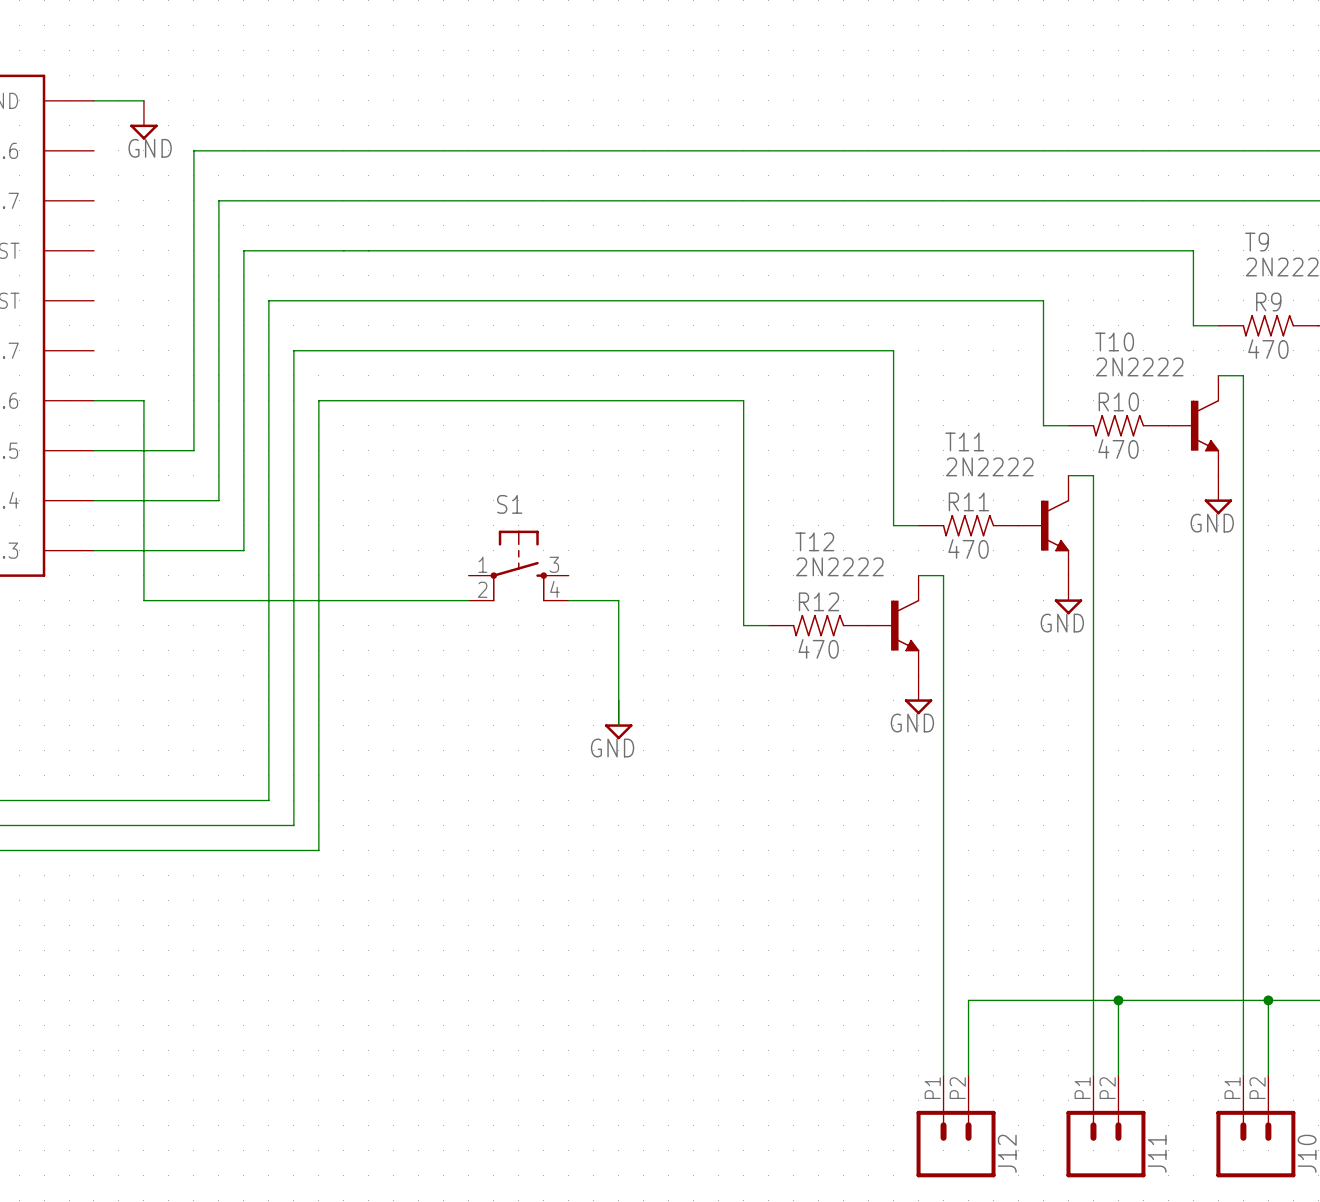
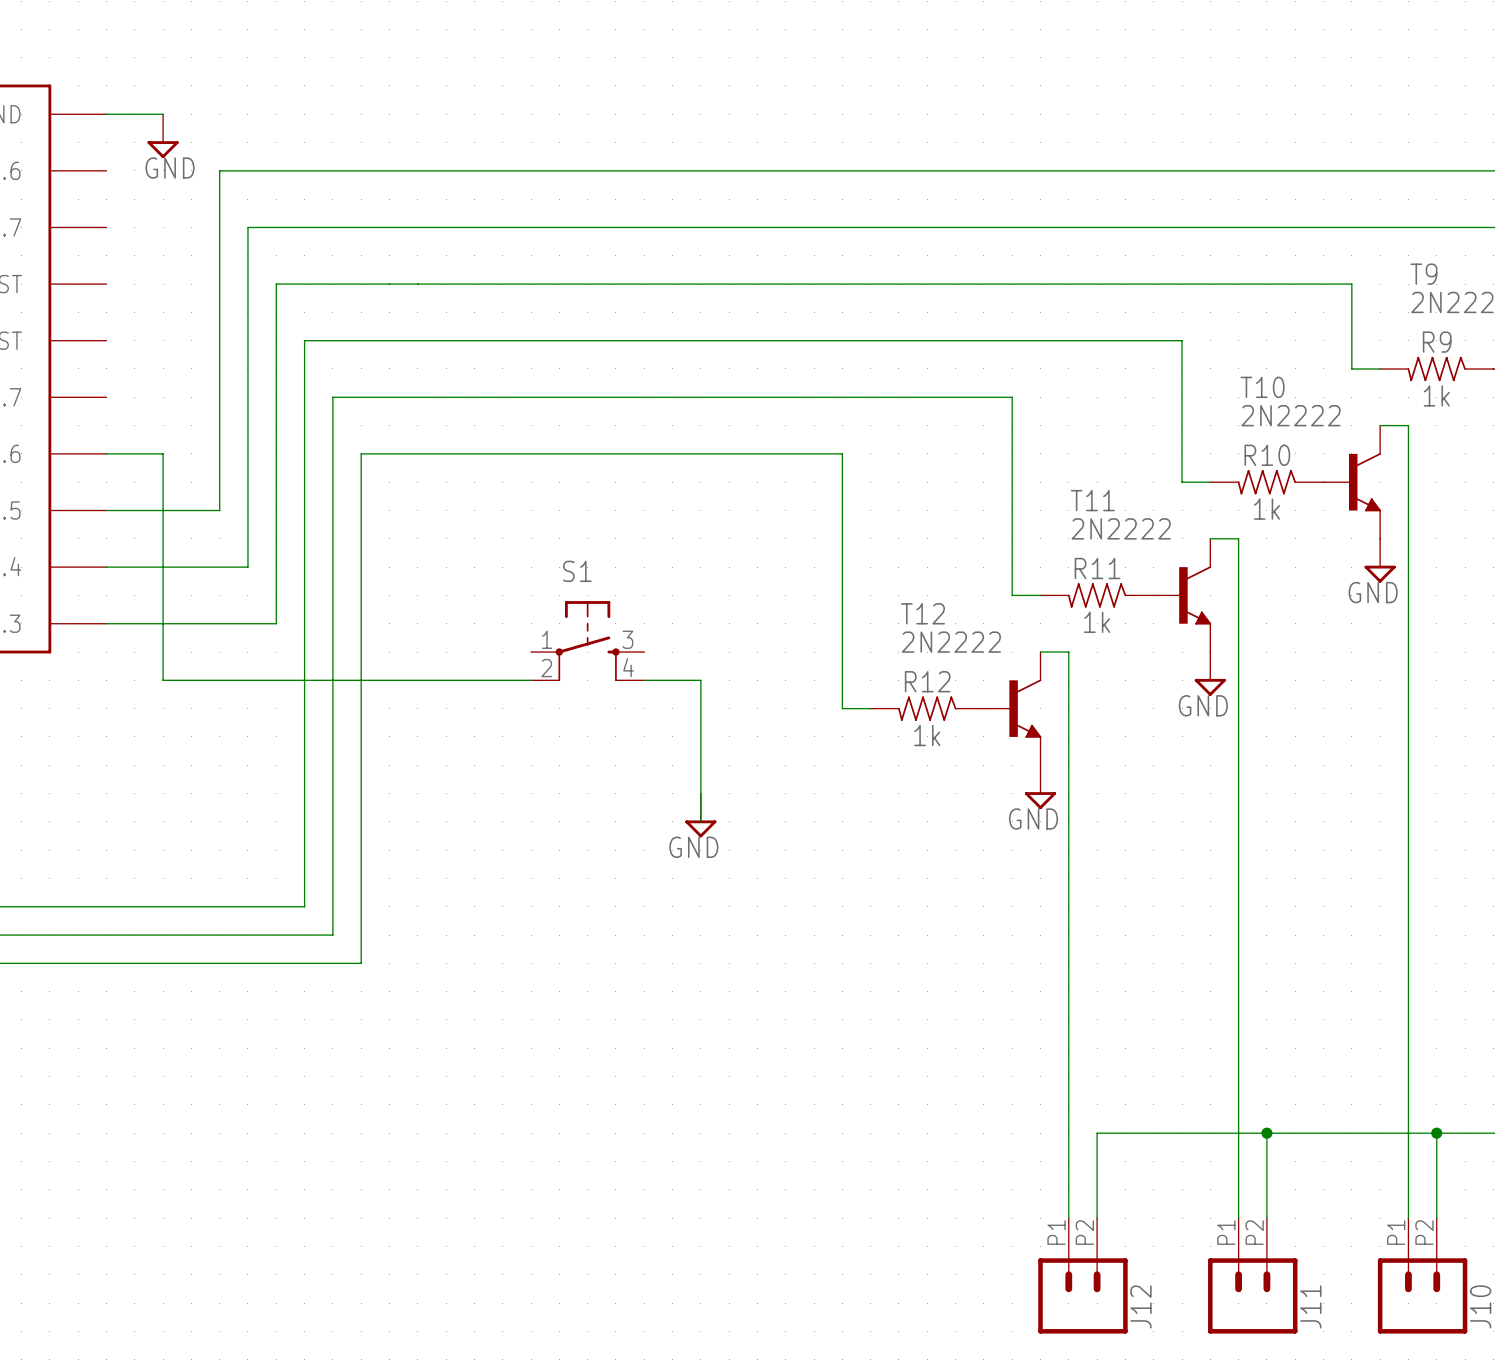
R9 value: 470 (1268, 349) -> 1k (1436, 395)
R10 value: 470 (1118, 449) -> 1k (1266, 509)
R11 value: 470 (968, 548) -> 1k (1097, 622)
R12 value: 470 (818, 648) -> 1k (927, 735)

